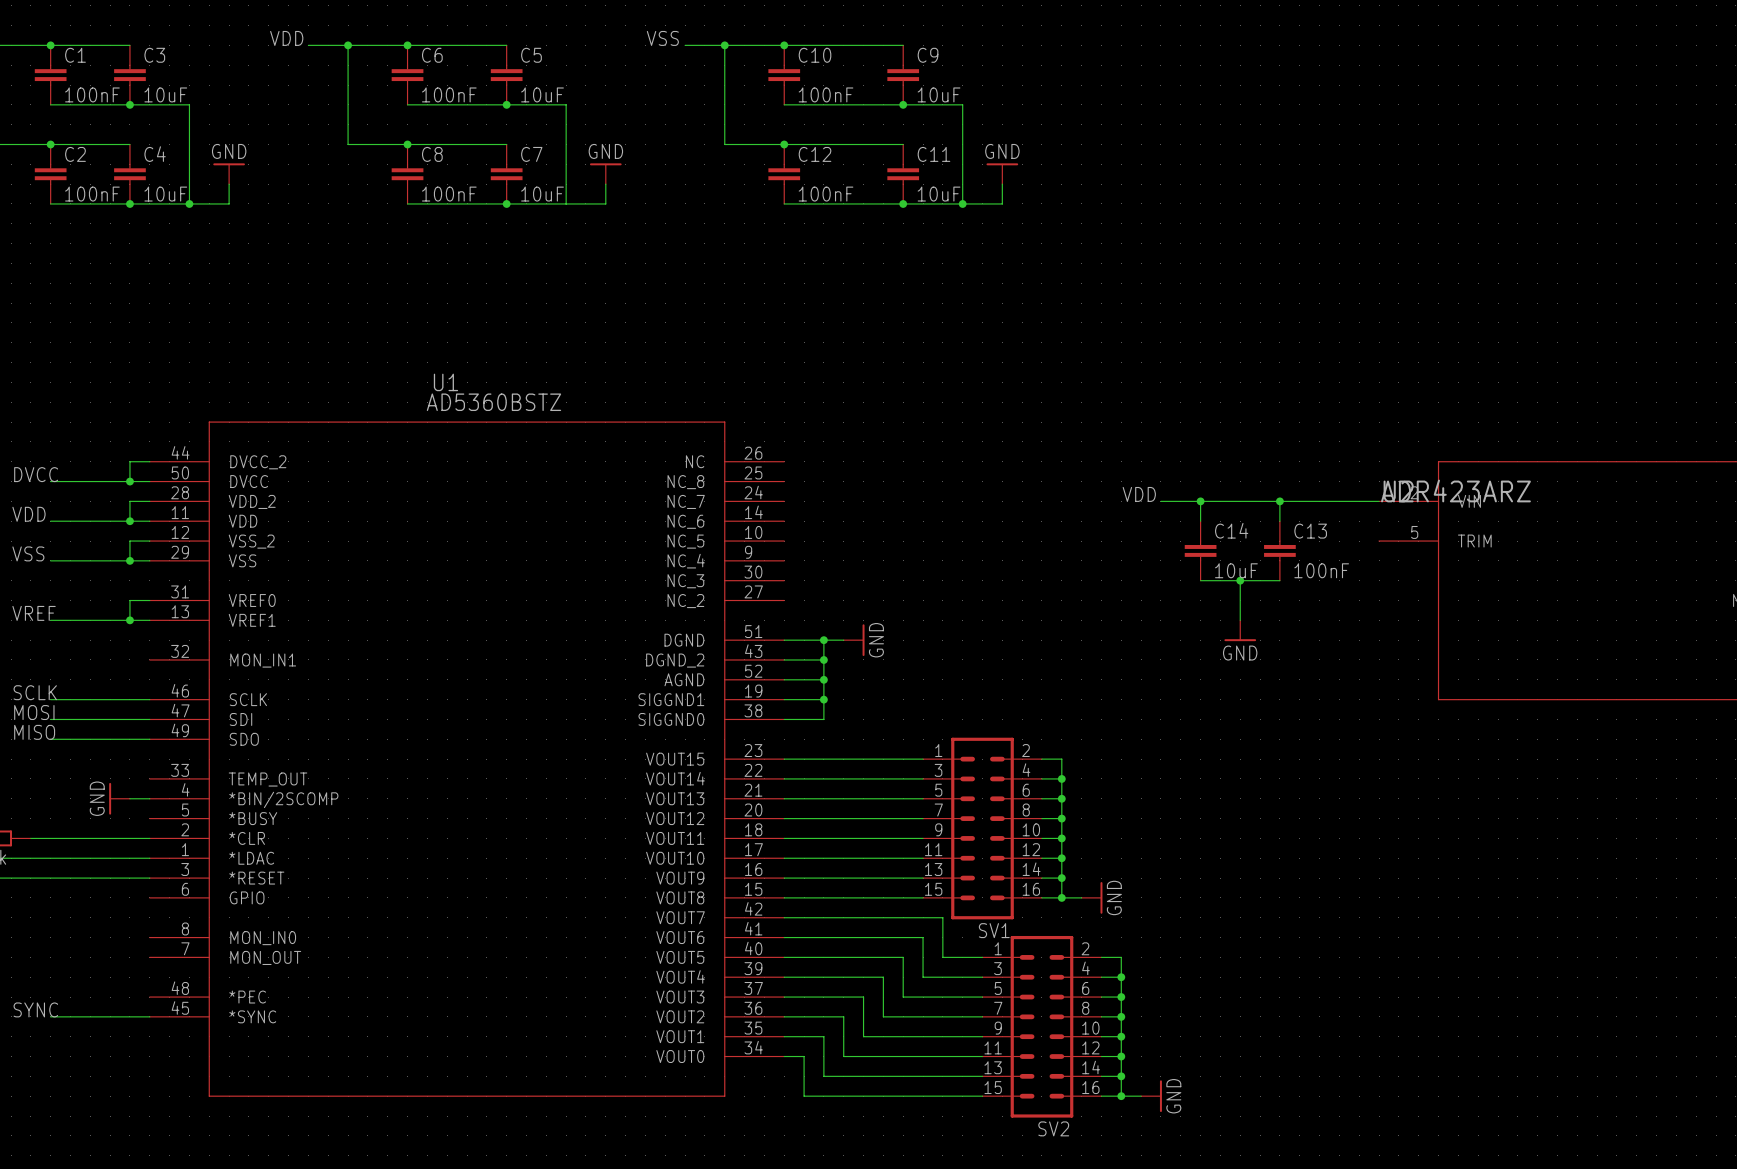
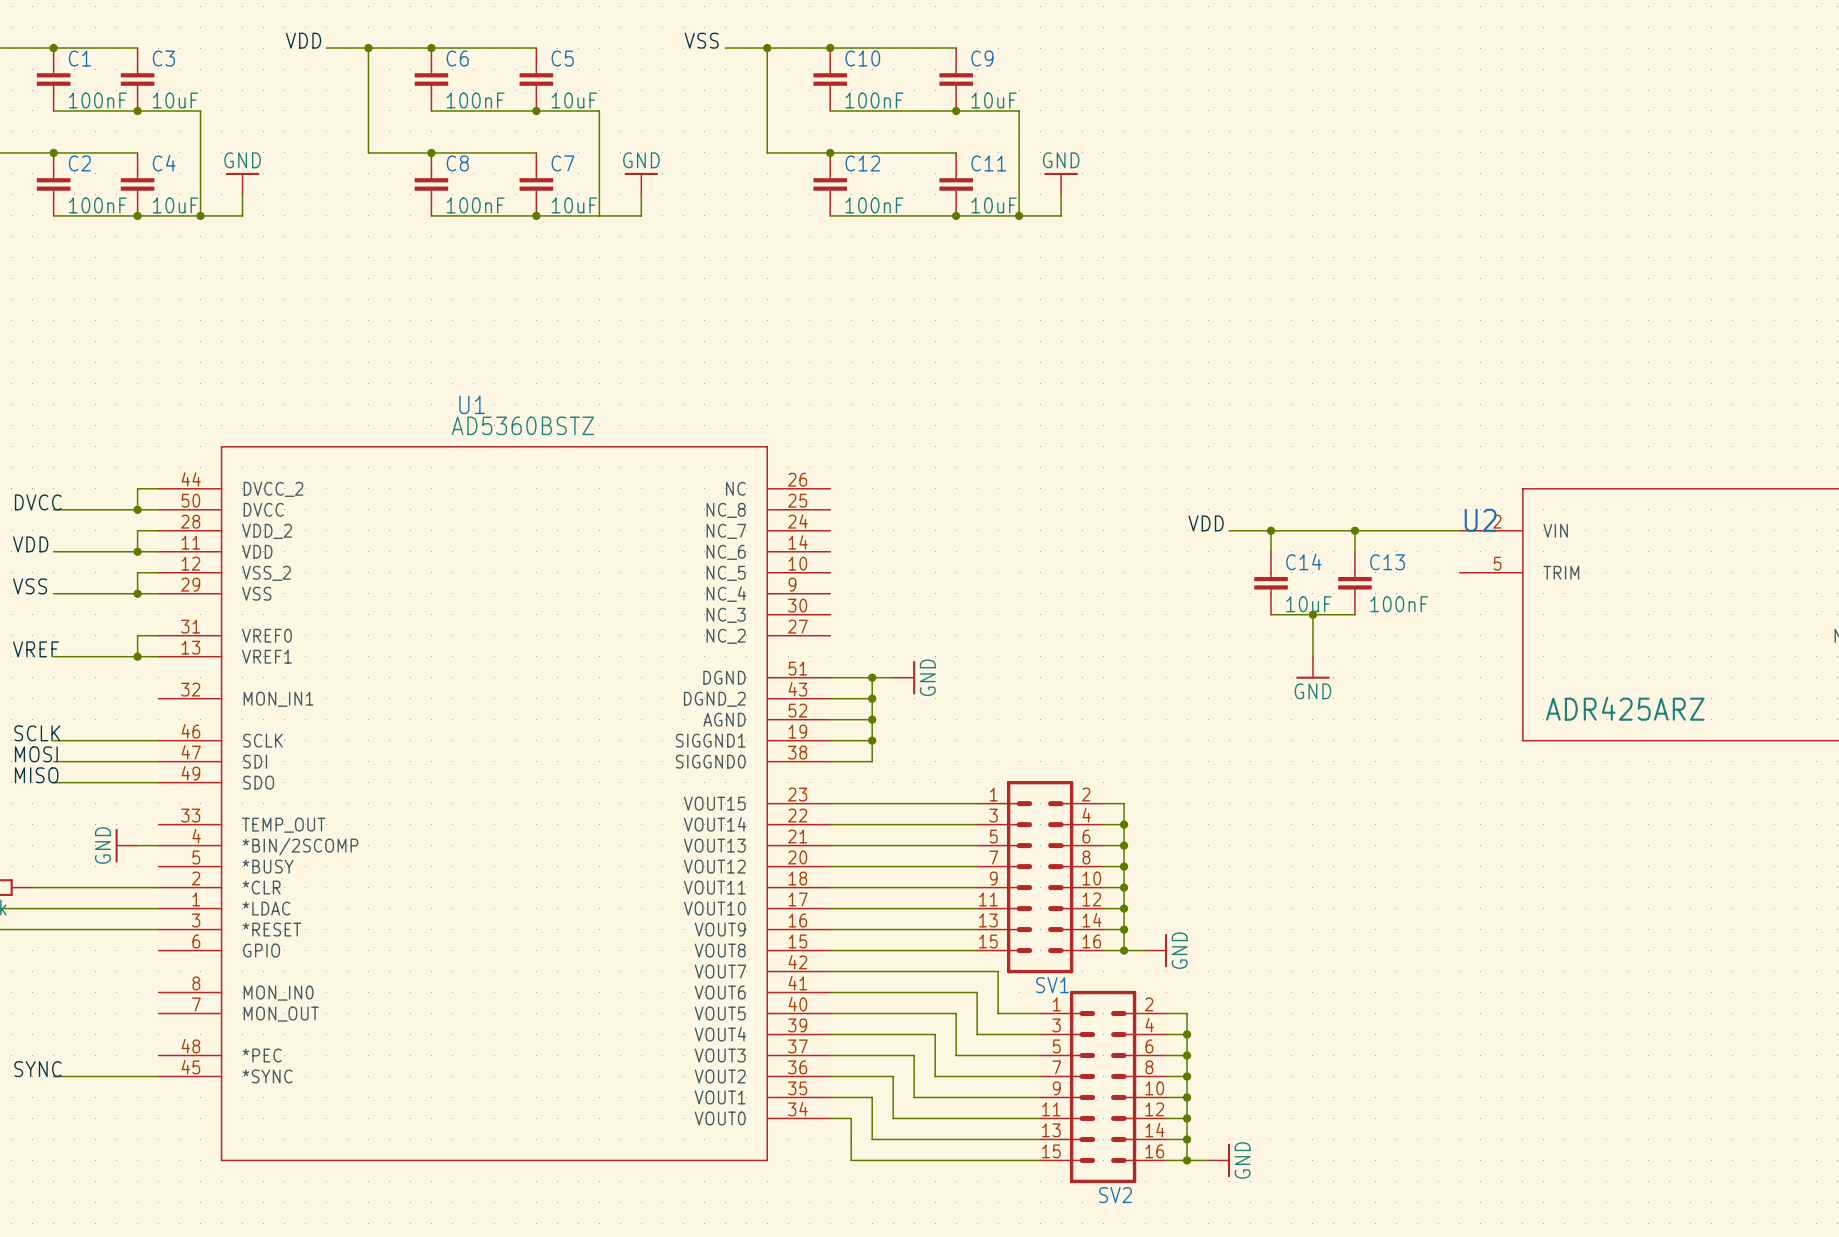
U2 value: ADR423ARZ (1455, 490) -> ADR425ARZ (1625, 708)

